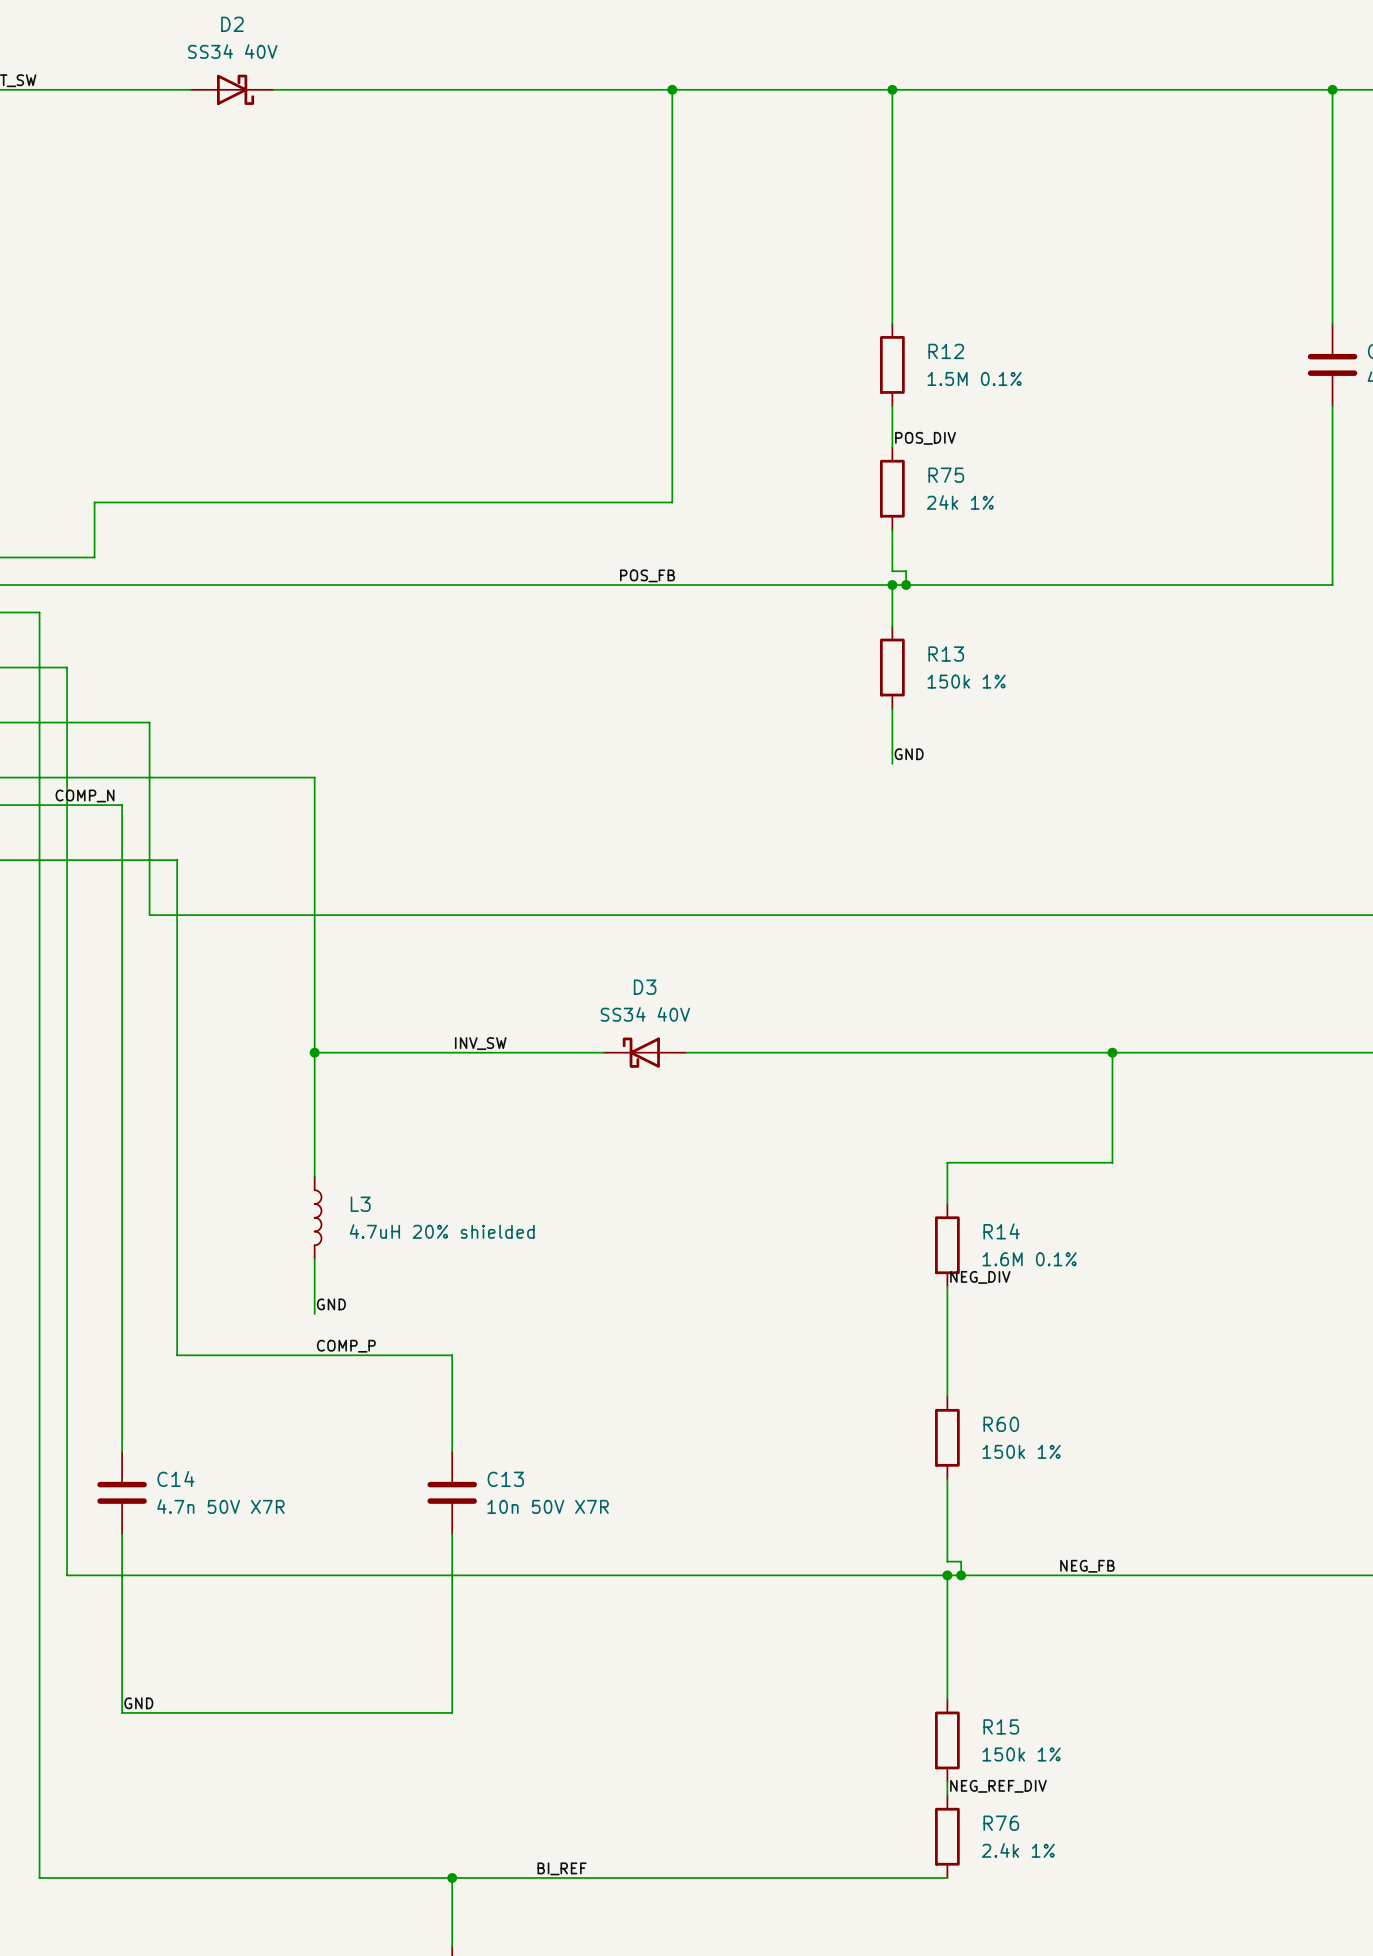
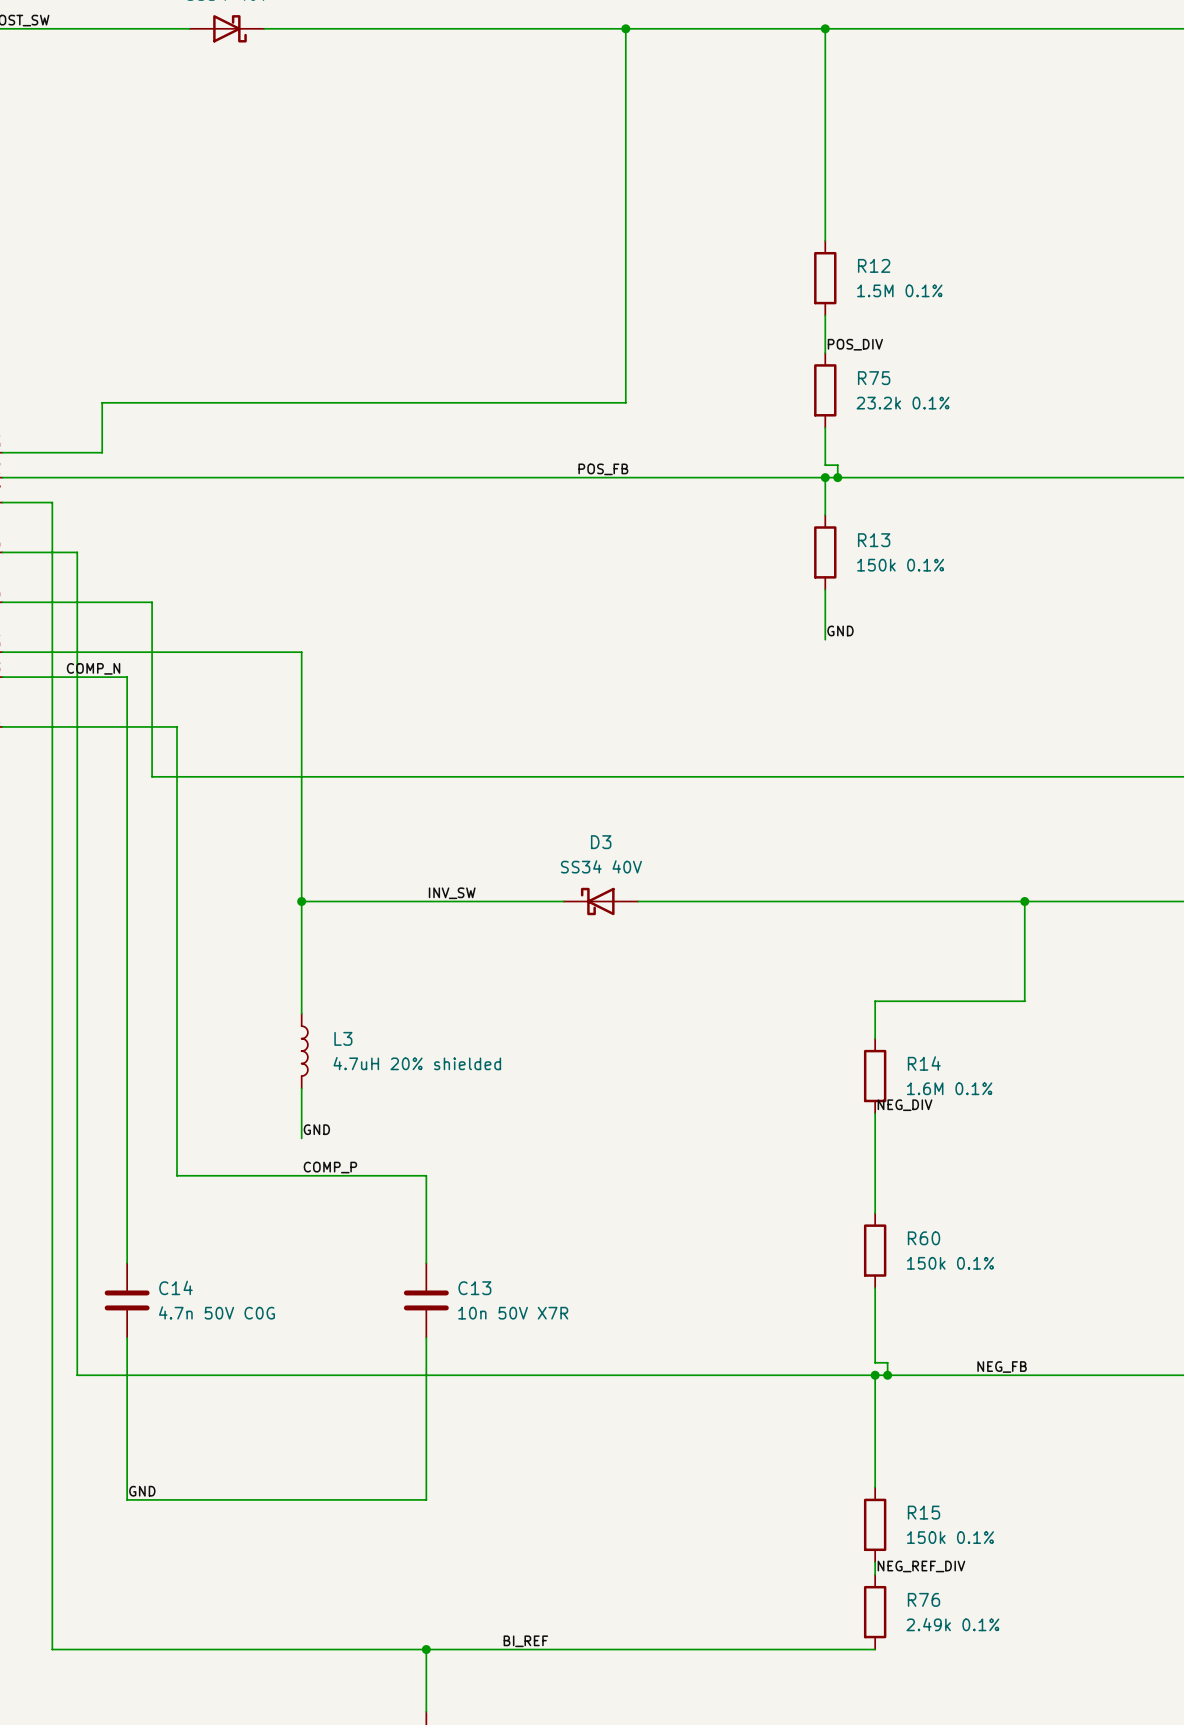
R75 value: 24k 1% (960, 502) -> 23.2k 0.1% (903, 403)
R13 value: 150k 1% (966, 681) -> 150k 0.1% (900, 565)
R60 value: 150k 1% (1021, 1451) -> 150k 0.1% (950, 1263)
C14 value: 4.7n 50V X7R (220, 1506) -> 4.7n 50V C0G (216, 1312)
R15 value: 150k 1% (1021, 1754) -> 150k 0.1% (950, 1537)
R76 value: 2.4k 1% (1018, 1850) -> 2.49k 0.1% (952, 1624)

